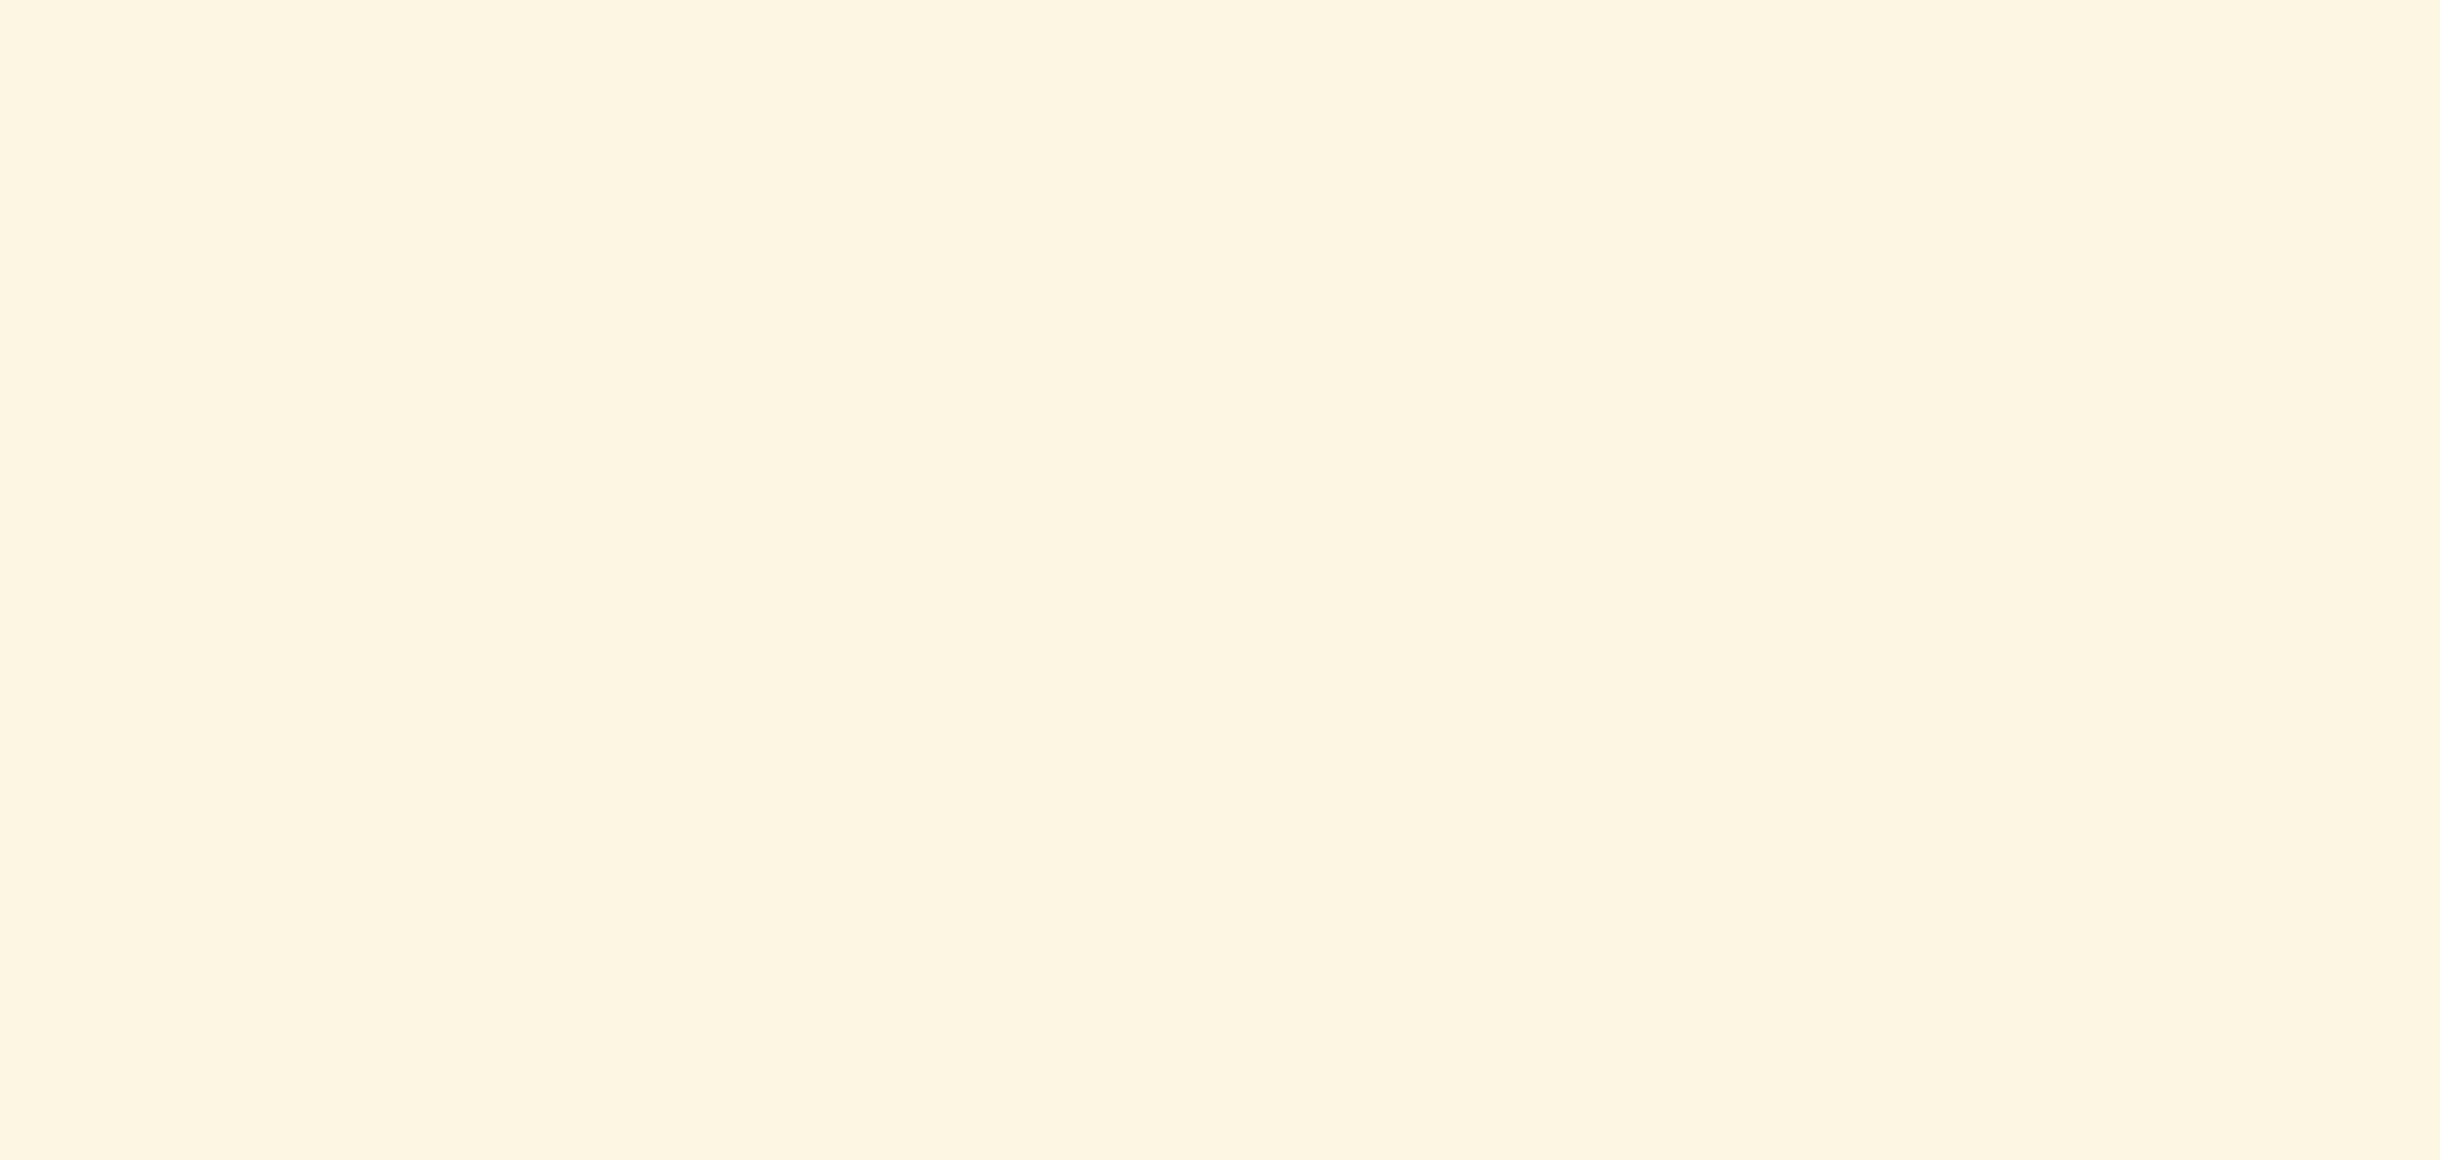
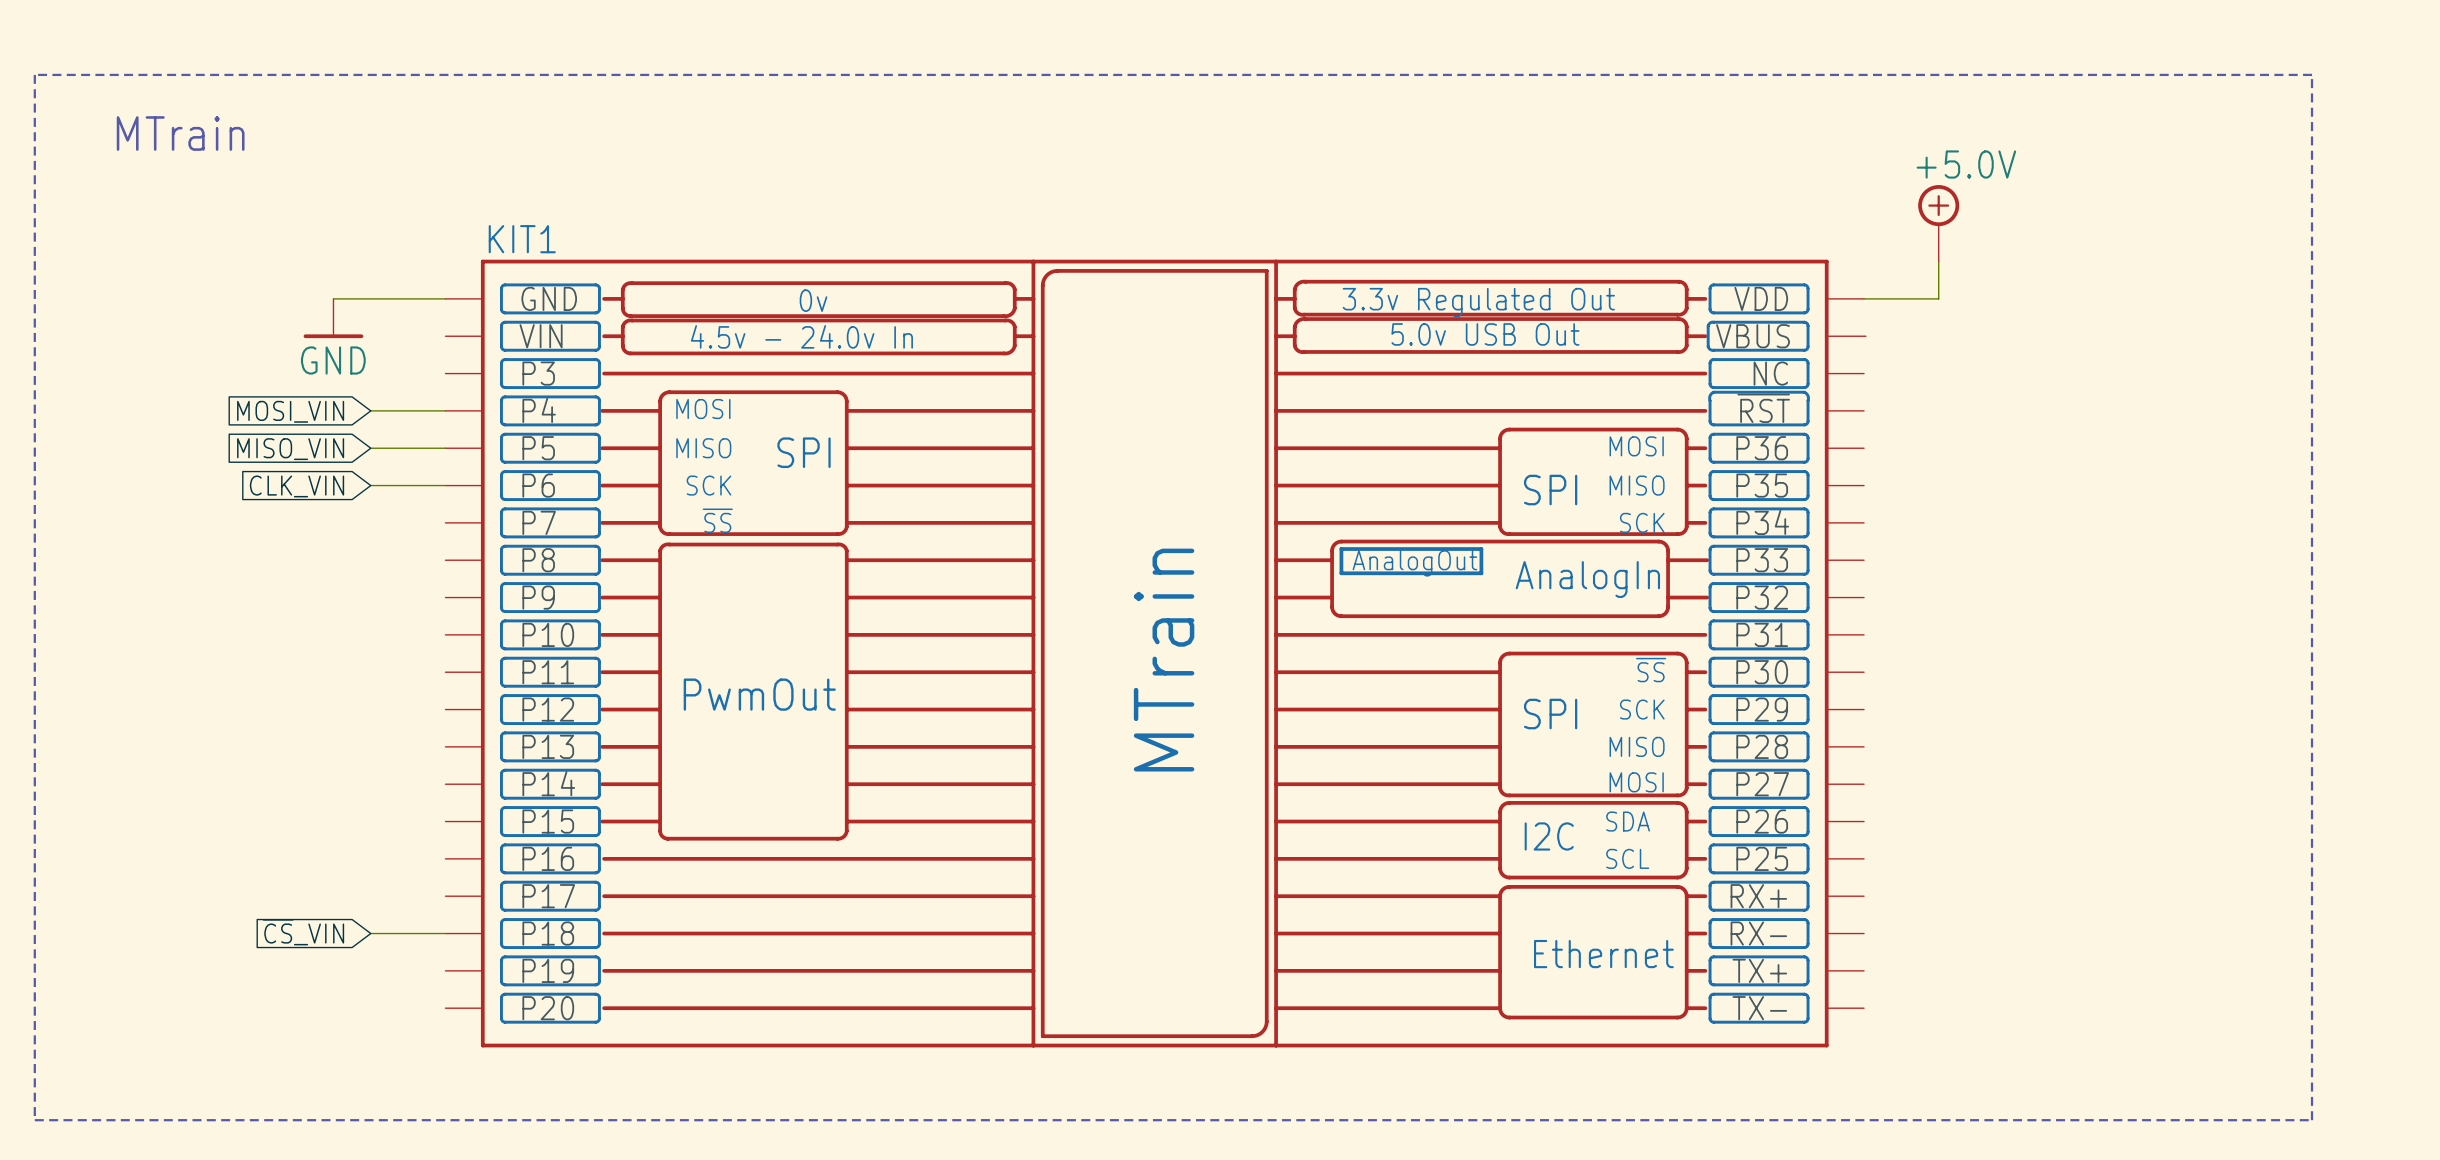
line: none -> (34, 74) (34, 1120) (2312, 1120) (2312, 74) (34, 74)
text: none -> MTrain (180, 133)
power symbol: none -> +5.0V (1938, 223)
wire: none -> (1938, 261) (1938, 298) (1864, 298)
wire: none -> (333, 298) (445, 298)
power symbol: none -> GND (333, 318)
wire: none -> (370, 410) (445, 410)
global label: none -> MOSI_VIN (290, 411)
wire: none -> (370, 448) (445, 448)
global label: none -> MISO_VIN (290, 449)
wire: none -> (370, 485) (445, 485)
global label: none -> CLK_VIN (297, 486)
KIT1: none -> (1155, 653)
global label: none -> ~{CS}_VIN (303, 932)
wire: none -> (370, 933) (445, 933)

